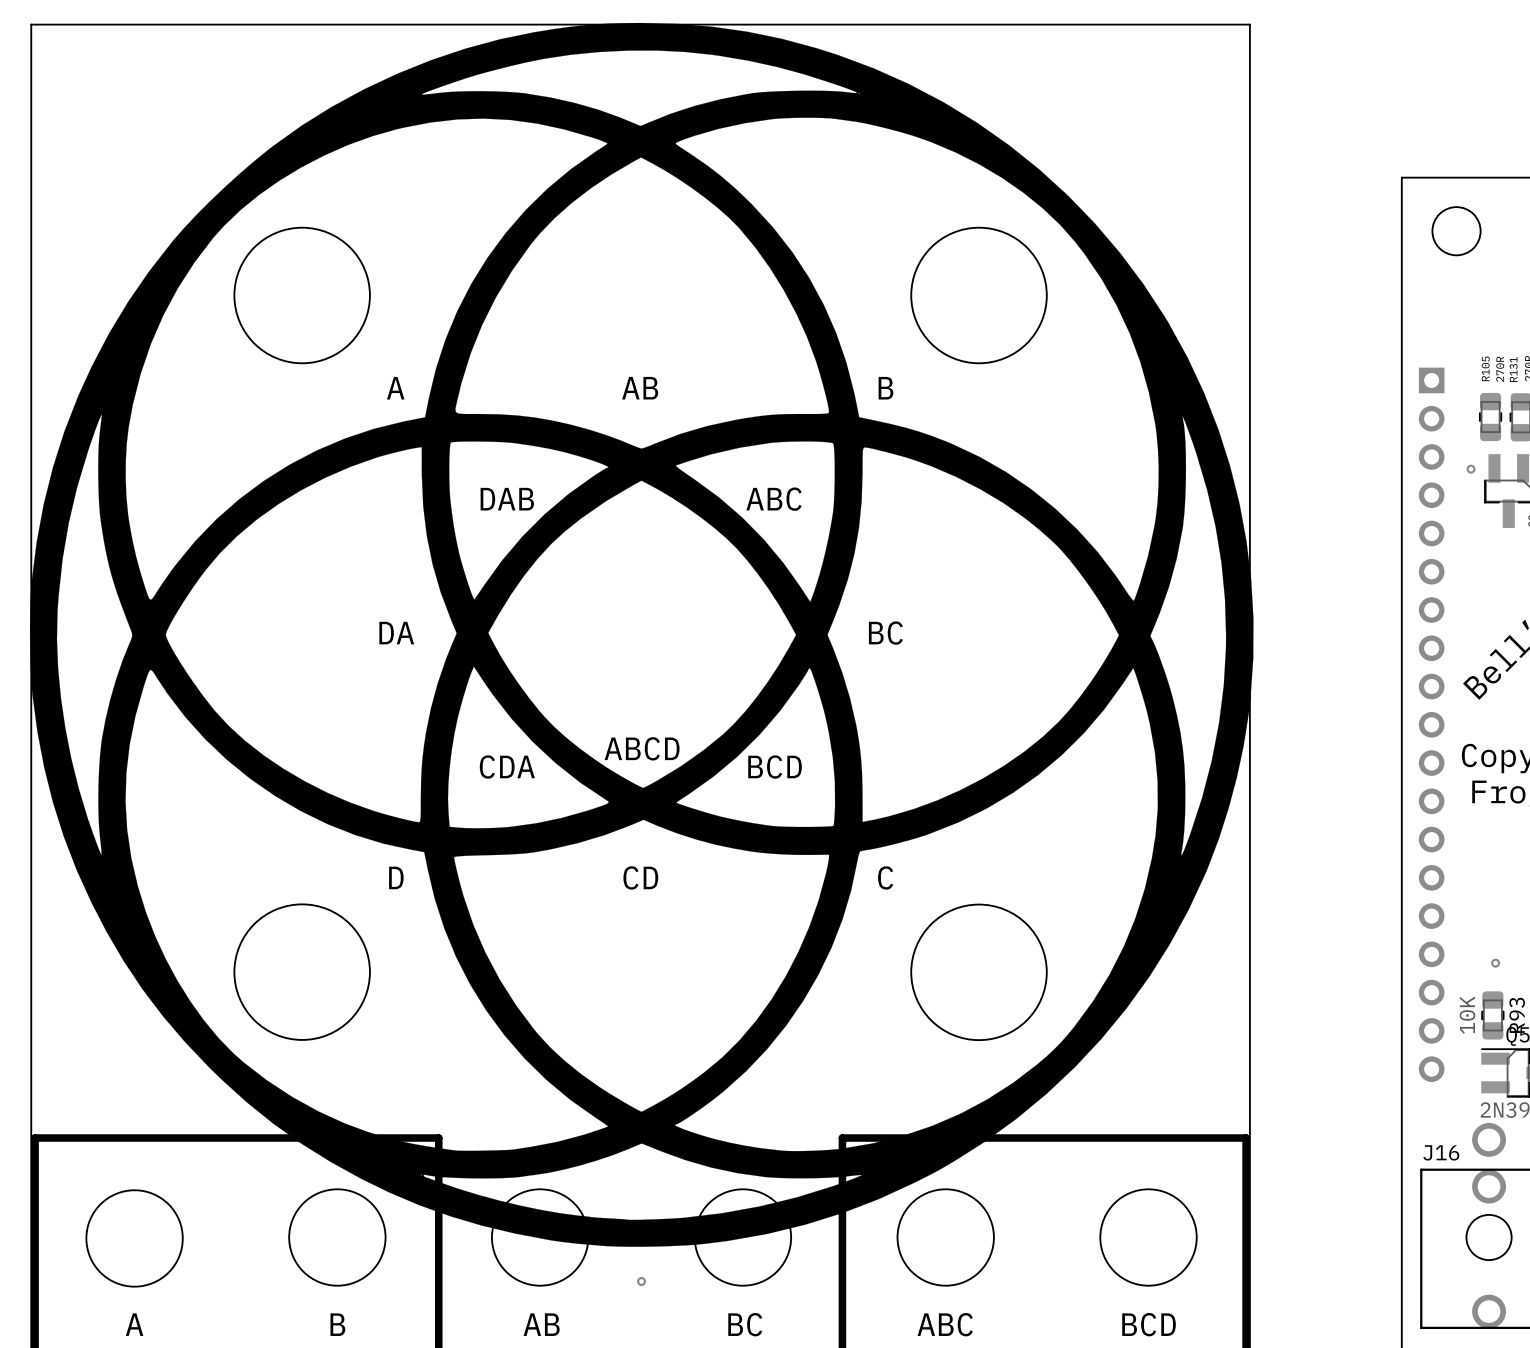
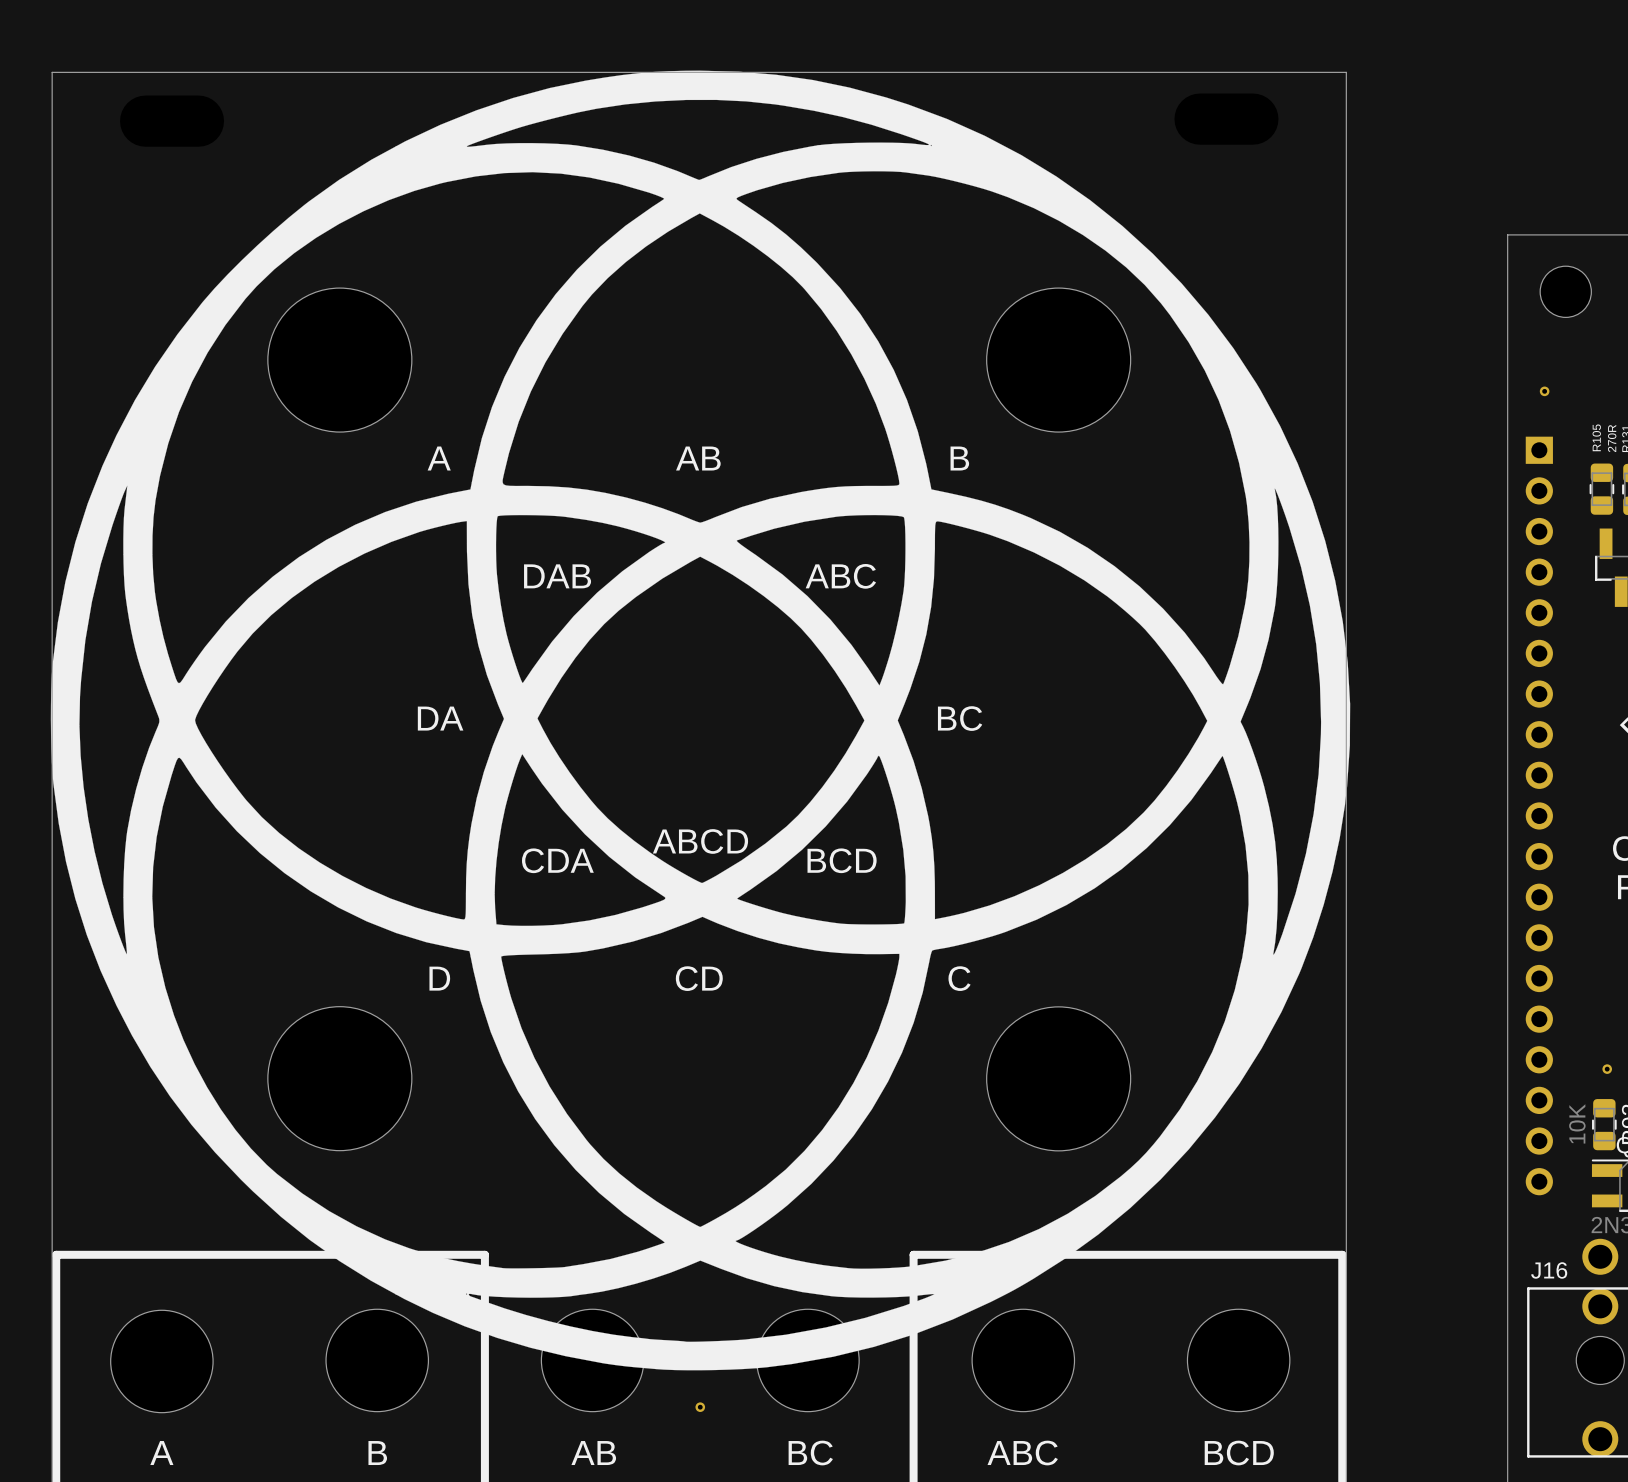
part position: (1471, 469) -> (1544, 391)

